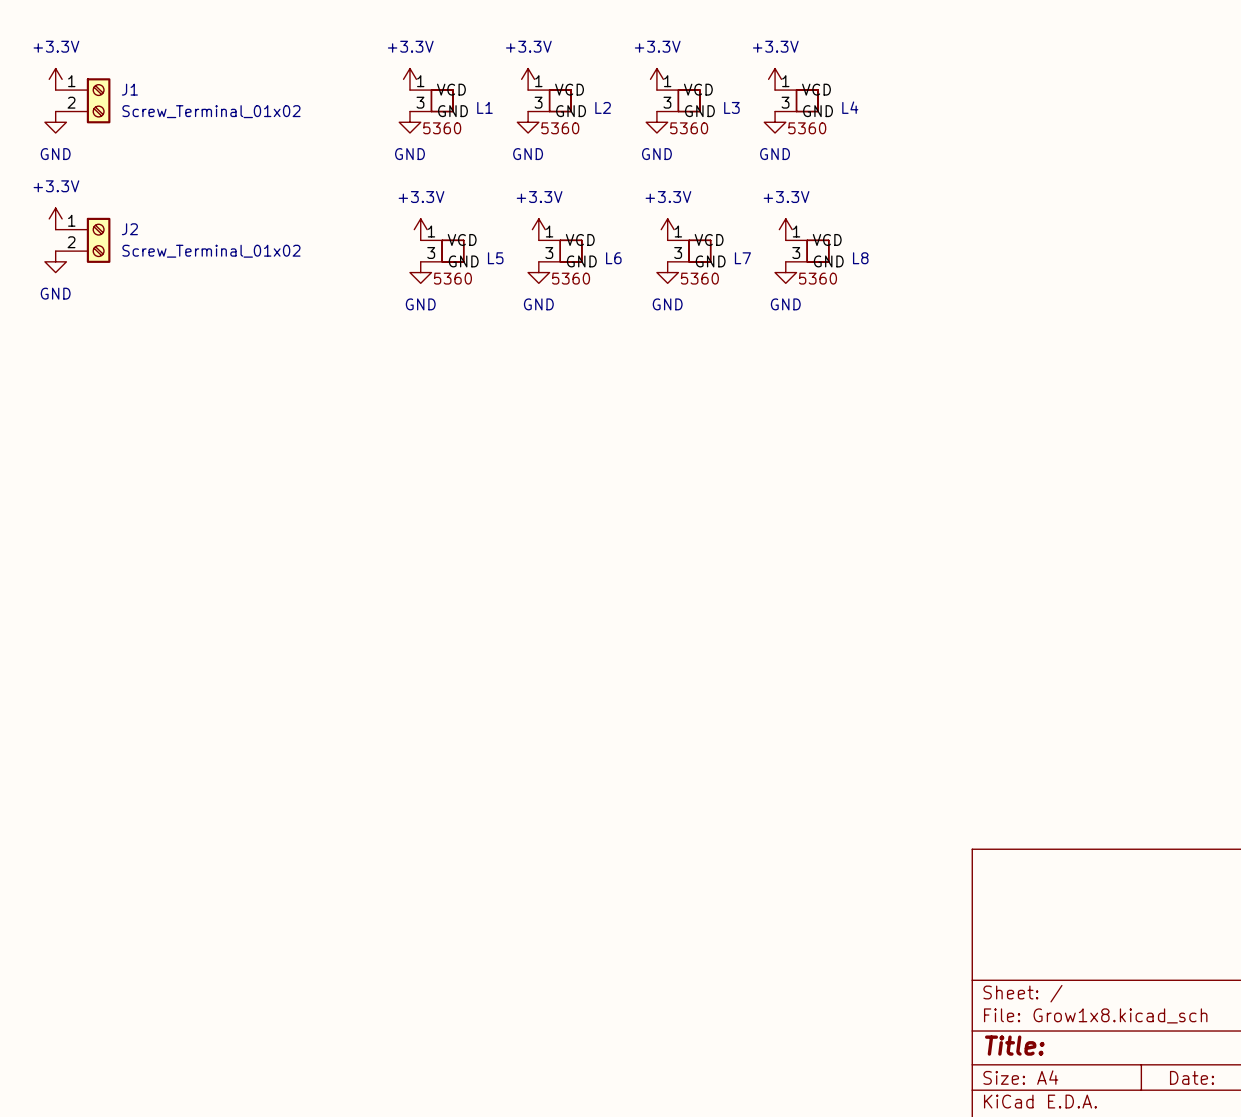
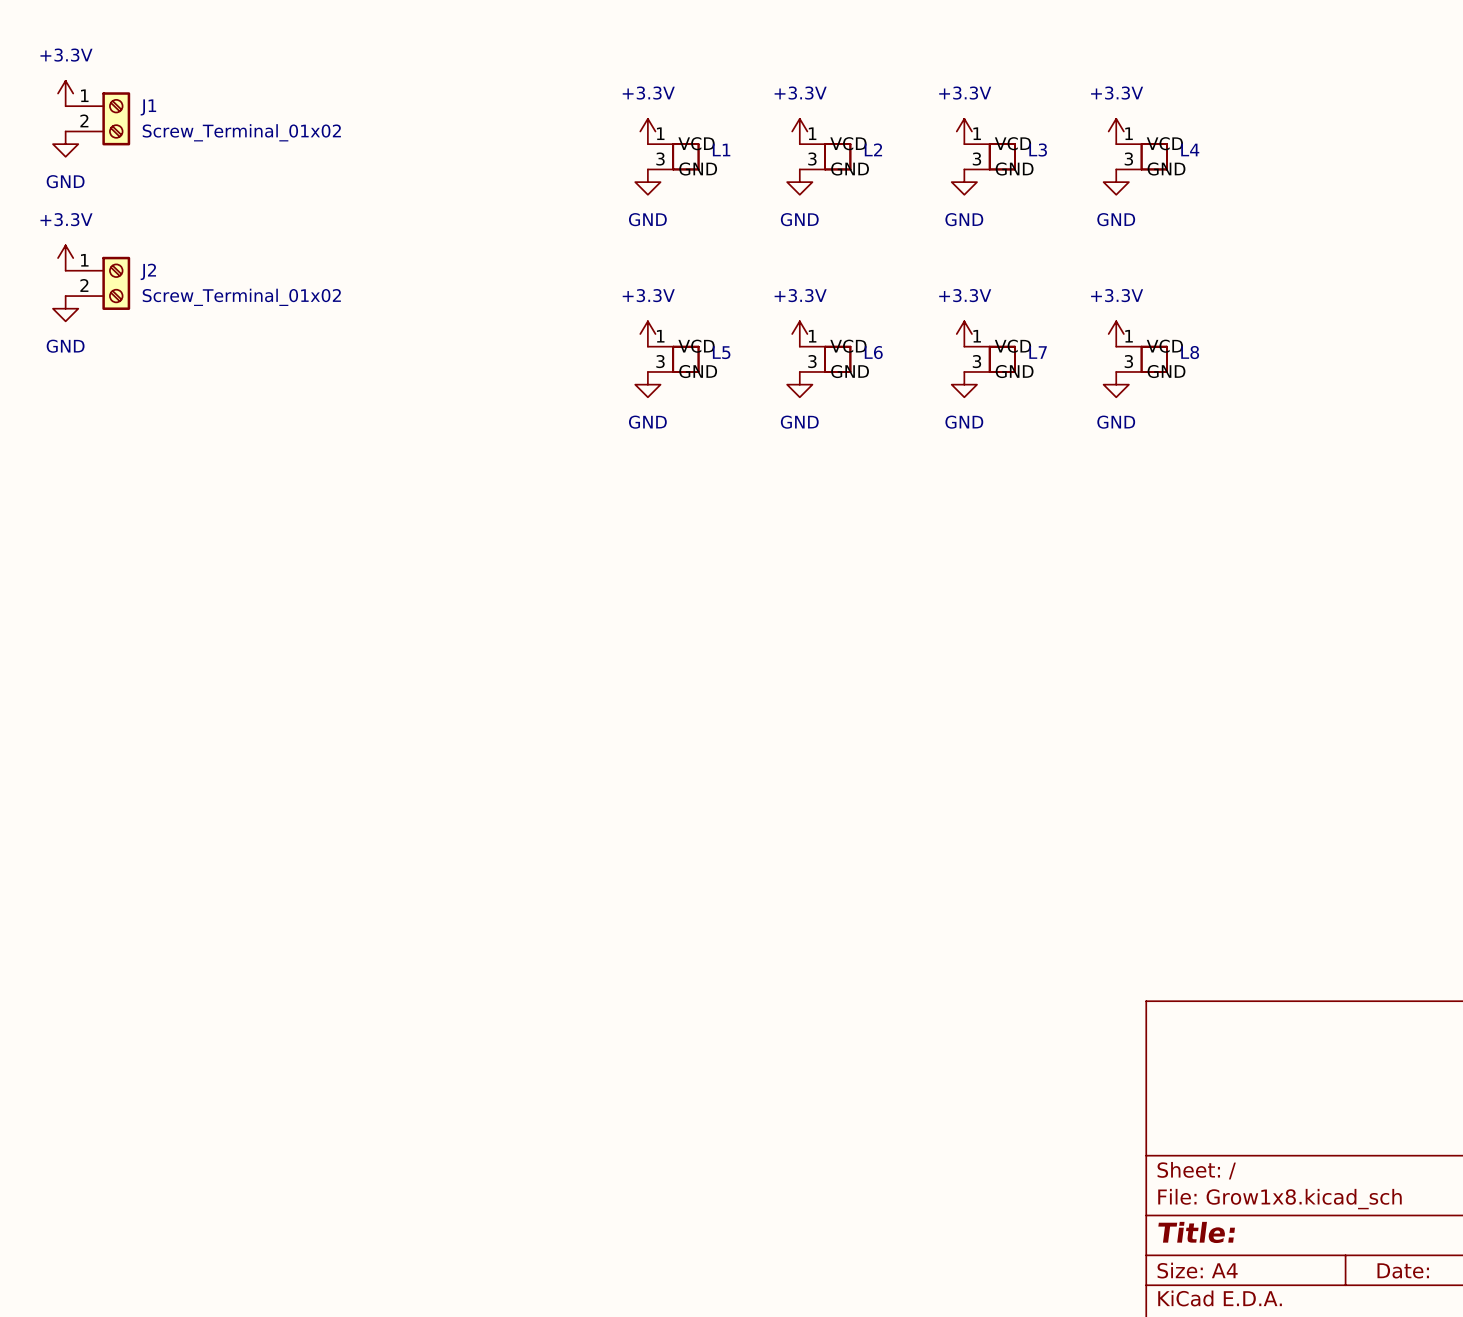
power symbol: +3.3V (409, 79) -> none
power symbol position: +3.3V (528, 79) -> +3.3V (647, 131)
power symbol position: +3.3V (656, 79) -> +3.3V (799, 131)
power symbol: +3.3V (775, 79) -> none
L1 position: (431, 100) -> (673, 156)
L2 position: (549, 100) -> (825, 156)
L3 position: (678, 100) -> (989, 156)
L4 position: (796, 100) -> (1141, 156)
L1 name position: L1 (484, 107) -> L1 (721, 150)
L2 name position: L2 (603, 107) -> L2 (873, 149)
L3 name position: L3 (731, 107) -> L3 (1038, 150)
L4 name position: L4 (850, 107) -> L4 (1190, 150)
power symbol: none -> +3.3V (964, 131)
power symbol: none -> +3.3V (1116, 131)
power symbol: GND (409, 122) -> none
power symbol position: GND (528, 122) -> GND (647, 182)
power symbol position: GND (656, 122) -> GND (799, 182)
power symbol: GND (775, 122) -> none
L1 text: 5360 (442, 128) -> none
L2 text: 5360 (560, 128) -> none
L3 text: 5360 (689, 128) -> none
L4 text: 5360 (807, 128) -> none
power symbol: none -> GND (964, 182)
power symbol: none -> GND (1116, 182)
power symbol: +3.3V (420, 229) -> none
power symbol position: +3.3V (538, 229) -> +3.3V (647, 334)
power symbol position: +3.3V (667, 229) -> +3.3V (799, 334)
power symbol: +3.3V (785, 229) -> none
L5 position: (442, 251) -> (673, 359)
L6 position: (560, 251) -> (825, 359)
L7 position: (689, 251) -> (989, 359)
L8 position: (807, 251) -> (1141, 359)
L5 name position: L5 (495, 258) -> L5 (721, 352)
L6 name position: L6 (613, 258) -> L6 (873, 352)
L7 name position: L7 (742, 258) -> L7 (1038, 352)
L8 name position: L8 (860, 258) -> L8 (1190, 352)
power symbol: GND (420, 272) -> none
power symbol position: GND (538, 272) -> GND (647, 384)
power symbol position: GND (667, 272) -> GND (799, 384)
power symbol: GND (785, 272) -> none
L5 text: 5360 (452, 278) -> none
L6 text: 5360 (571, 278) -> none
L7 text: 5360 (699, 278) -> none
L8 text: 5360 (817, 278) -> none
power symbol: none -> +3.3V (964, 334)
power symbol: none -> +3.3V (1116, 334)
power symbol: none -> GND (964, 384)
power symbol: none -> GND (1116, 384)

